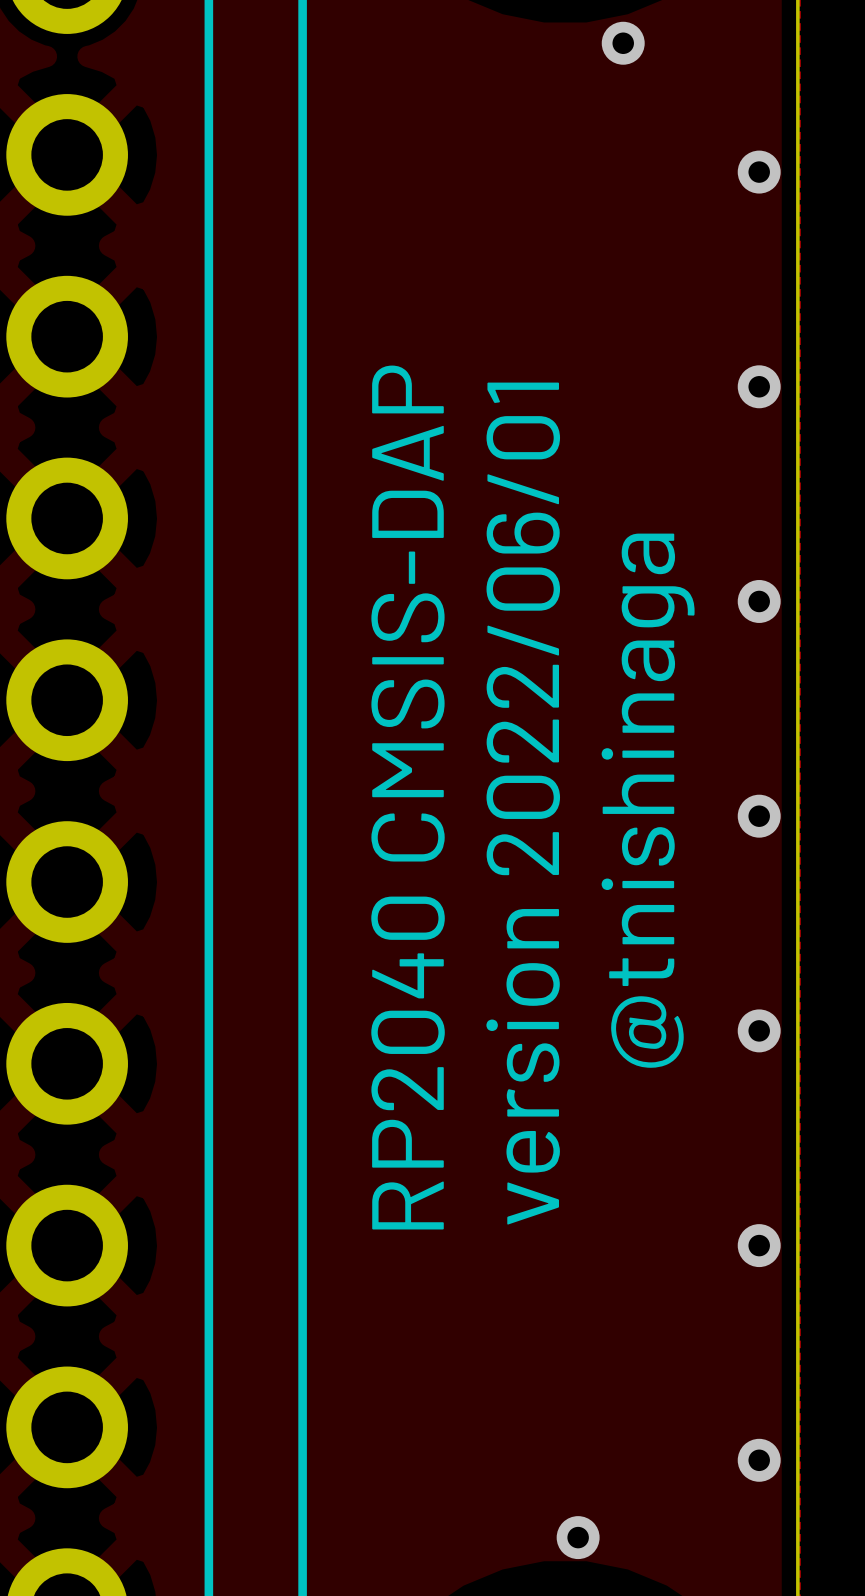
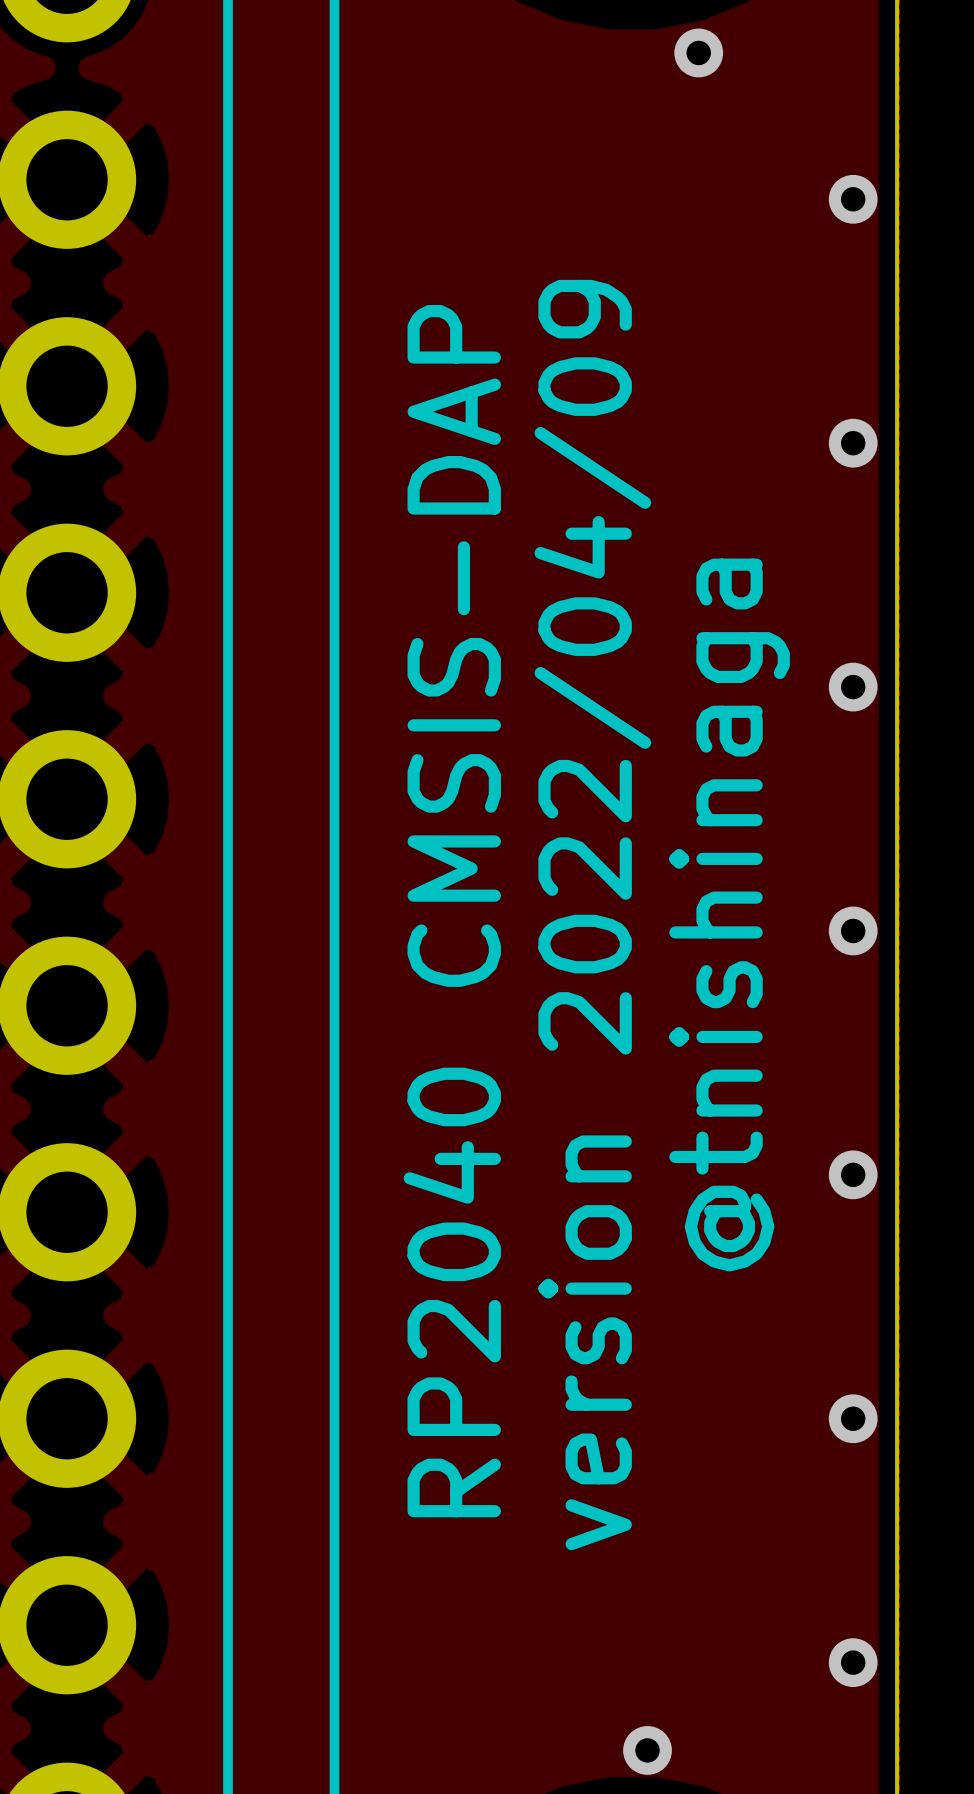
text: version 2022/06/01 (523, 803) -> version 2022/04/09 (592, 915)

